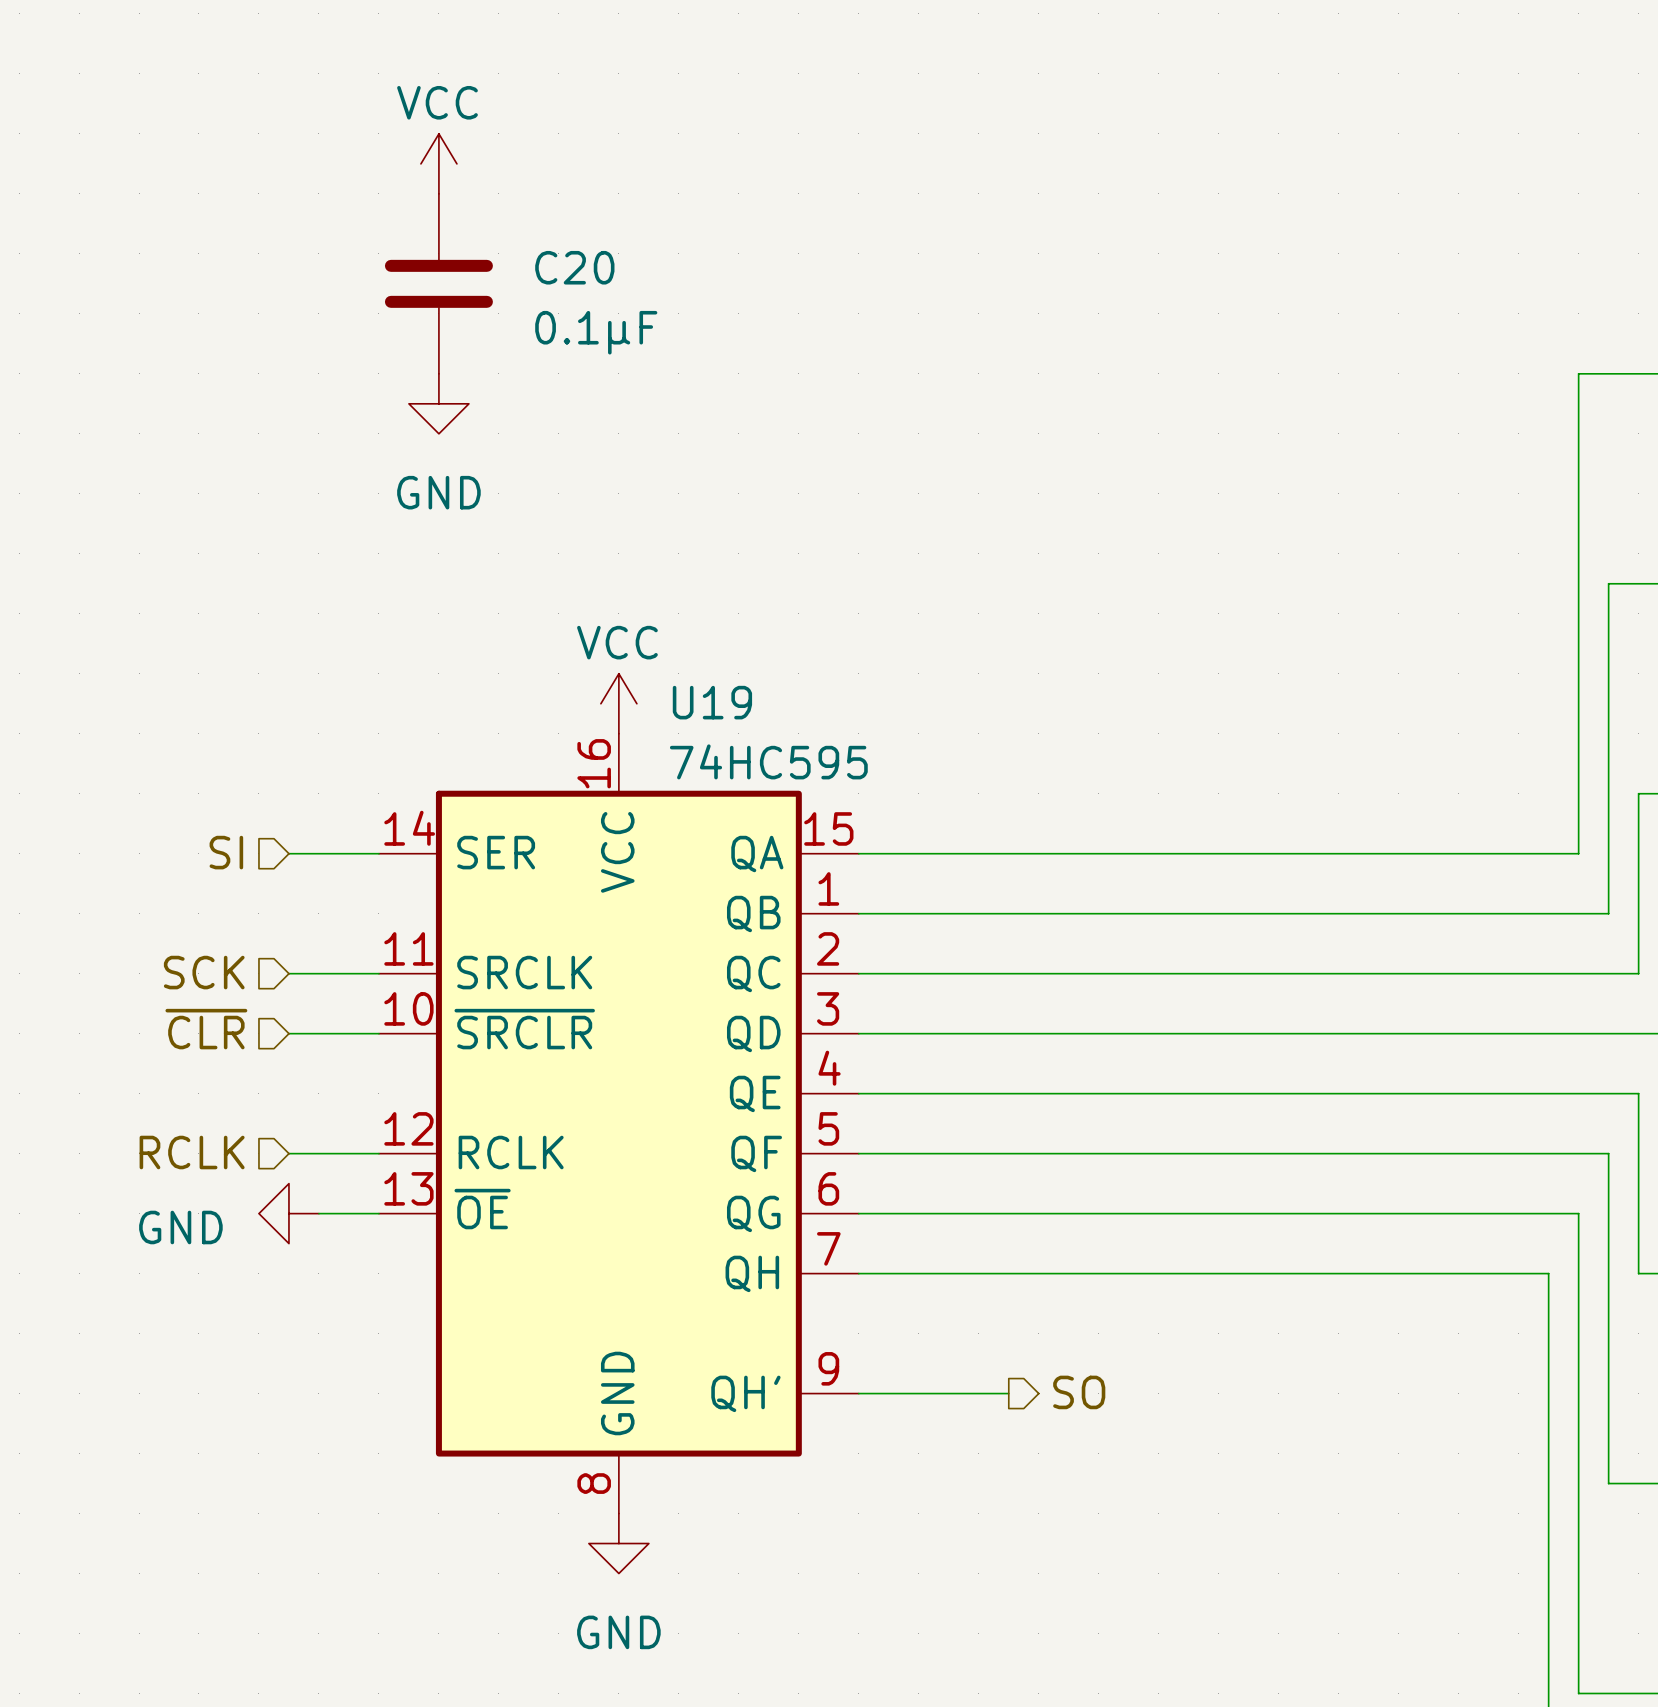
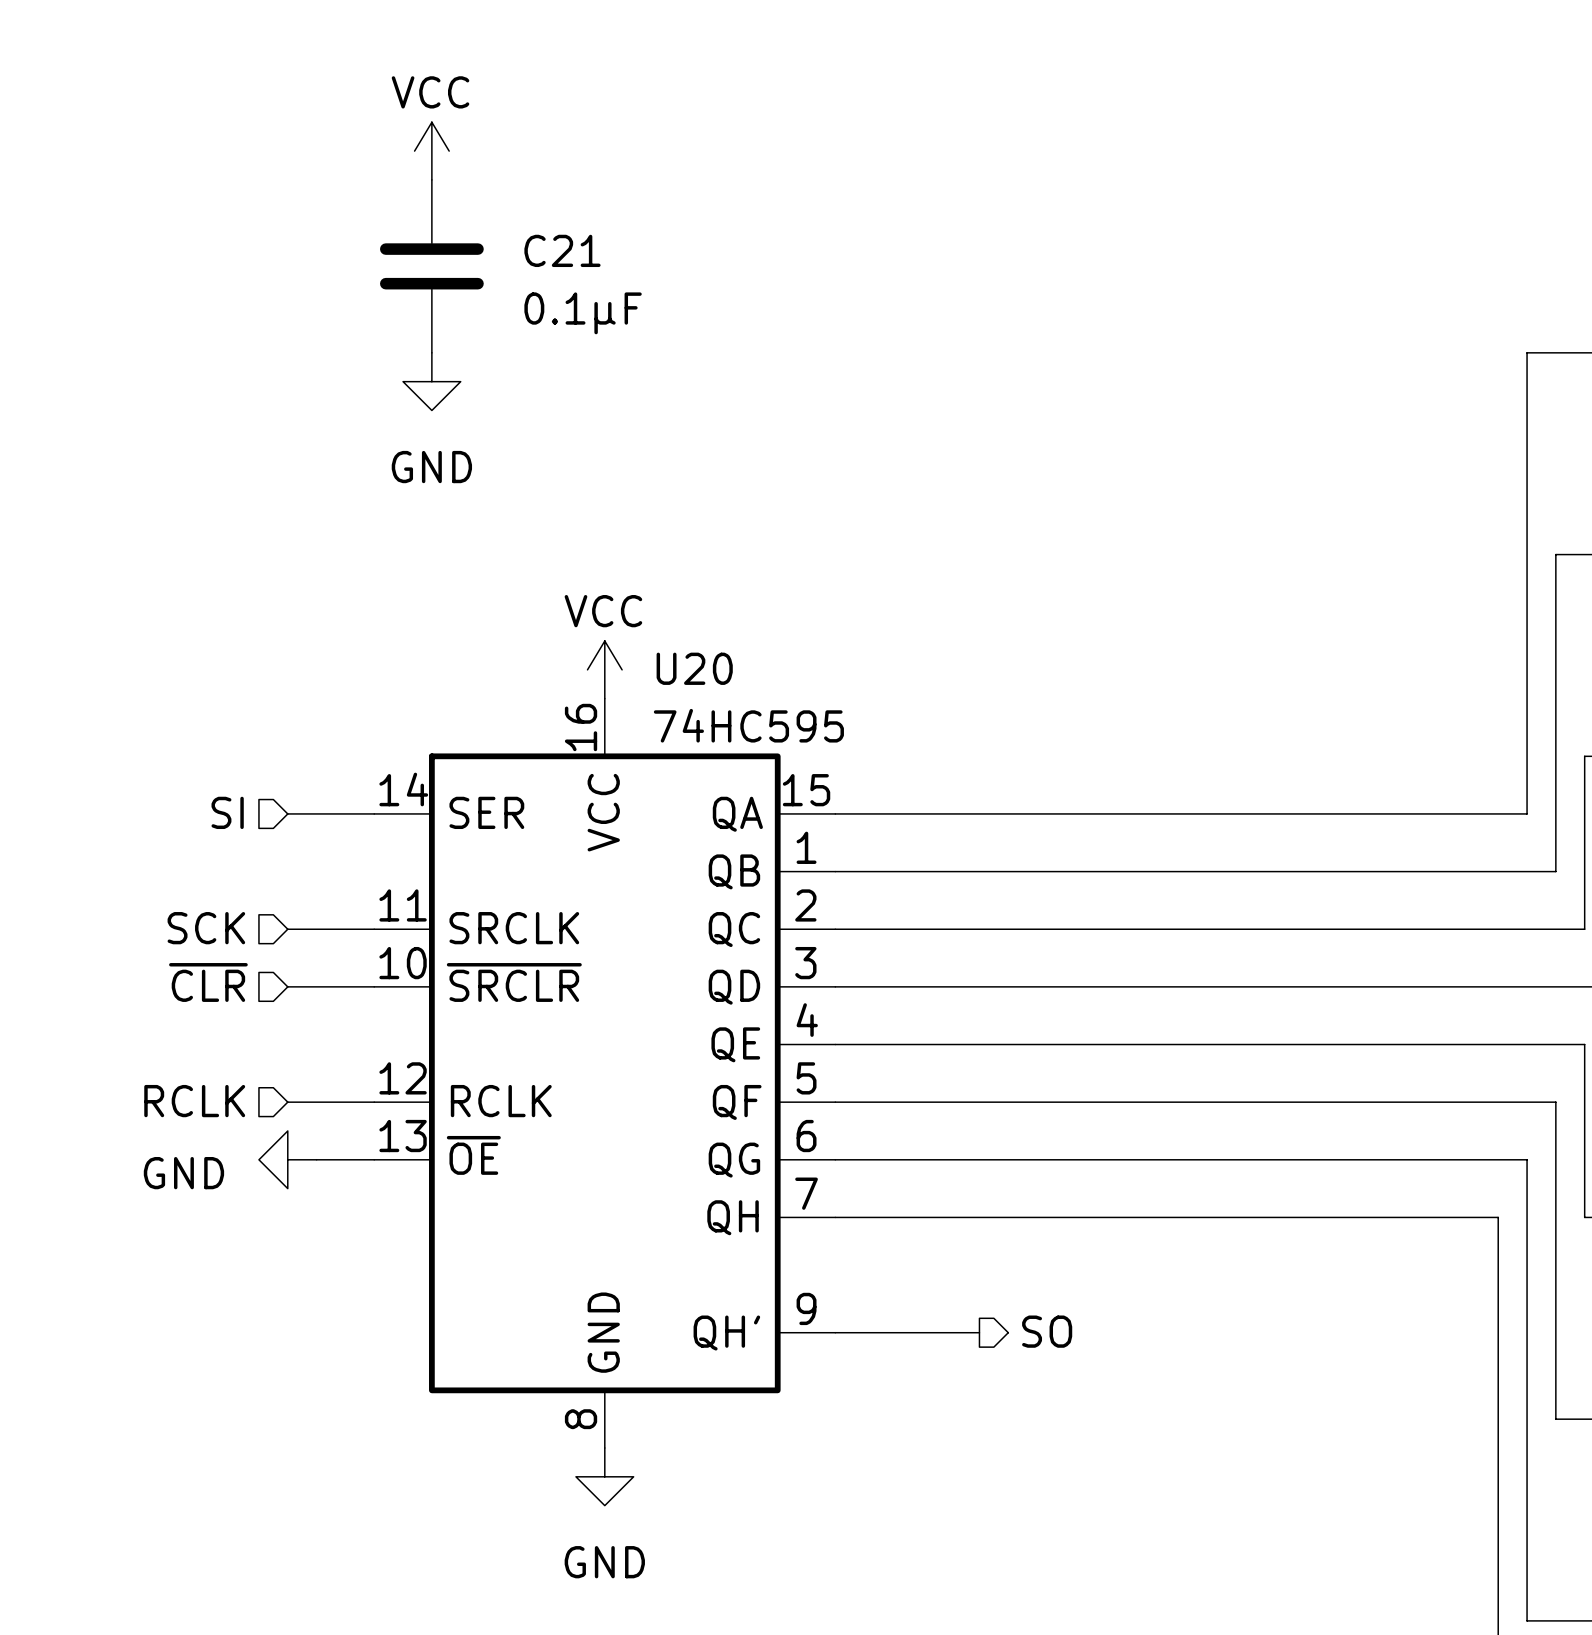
C20 name: C20 (574, 267) -> C21 (562, 250)
U19 name: U19 (712, 702) -> U20 (694, 668)

